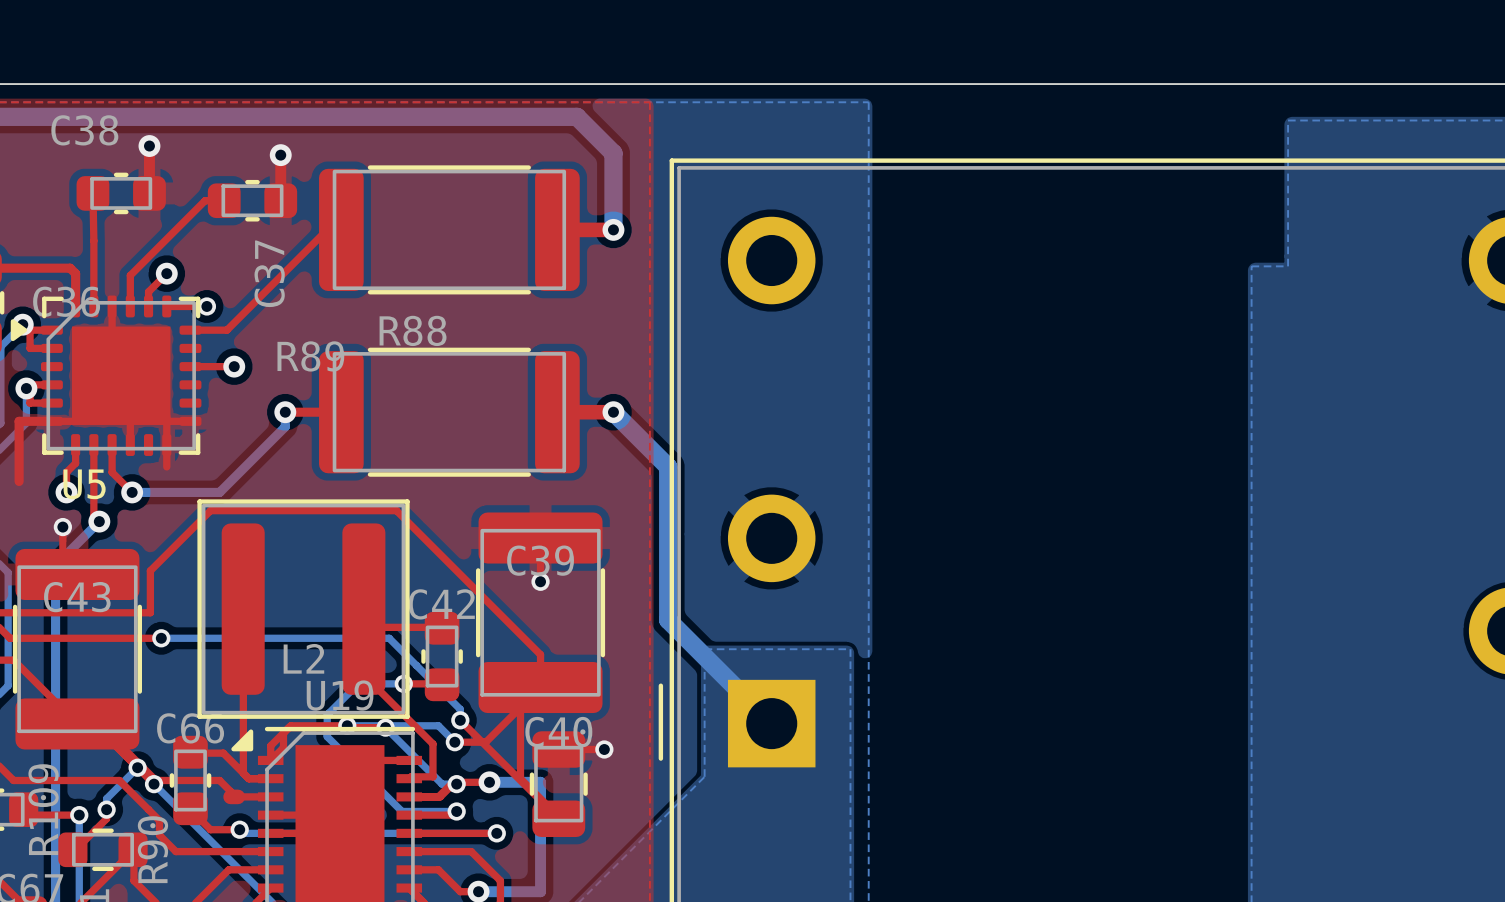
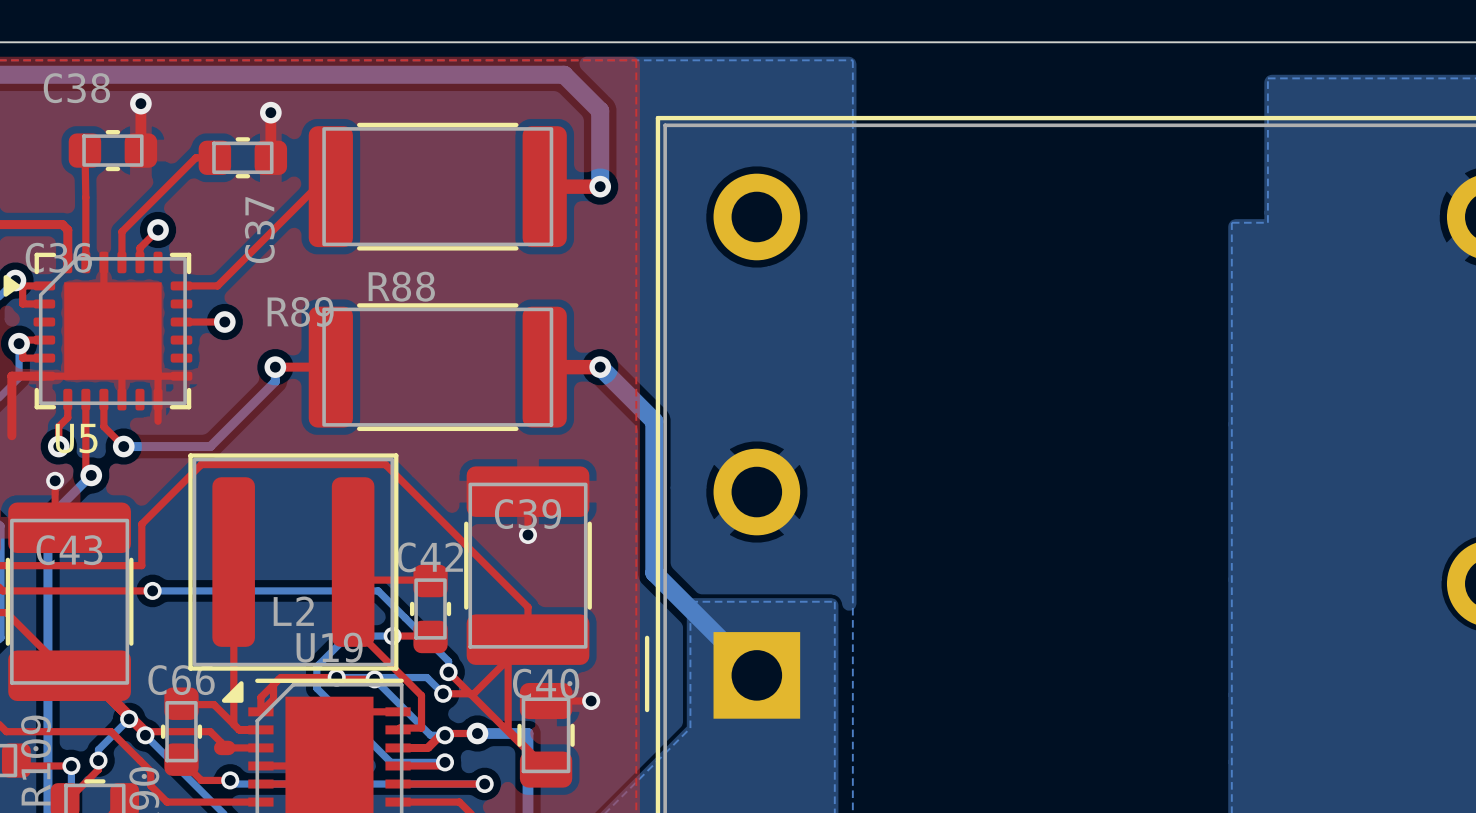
top track: (166, 306) (206, 306) -> none
via: (206, 306) -> none

